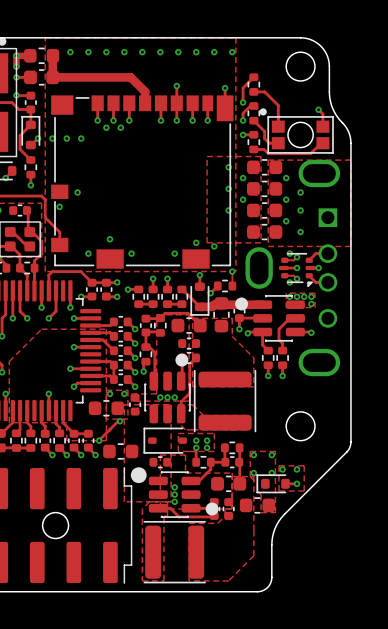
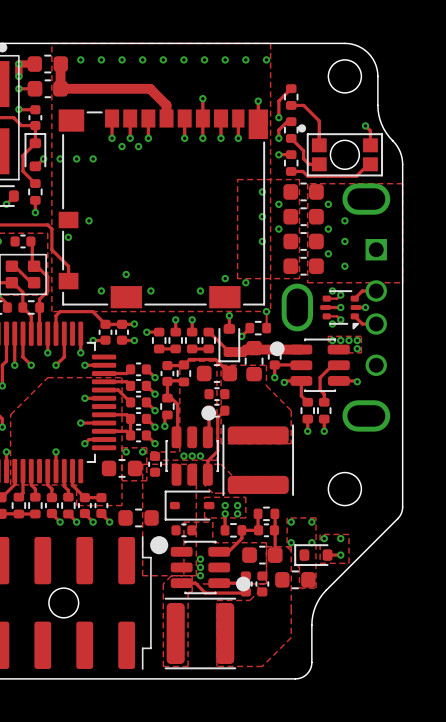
track: (120, 421) (100, 440) -> none
via: (120, 421) -> none
via: (99, 440) -> none

